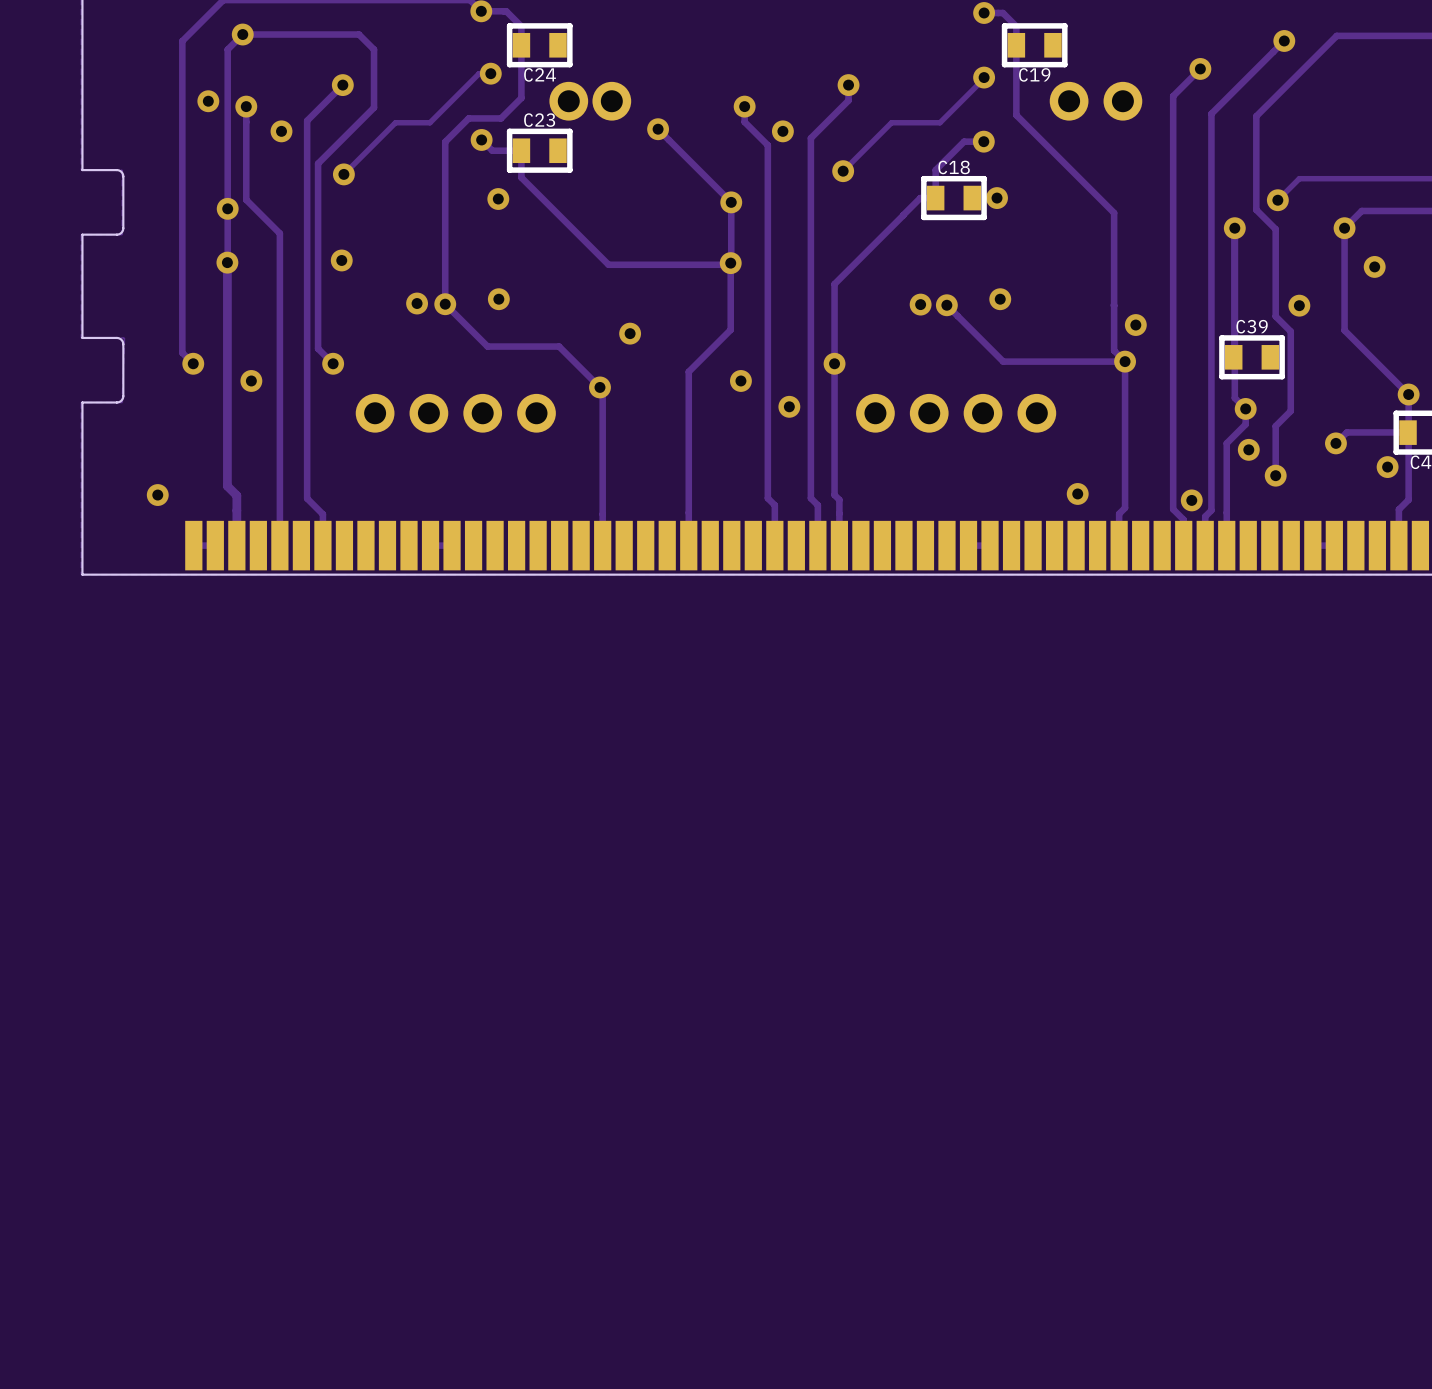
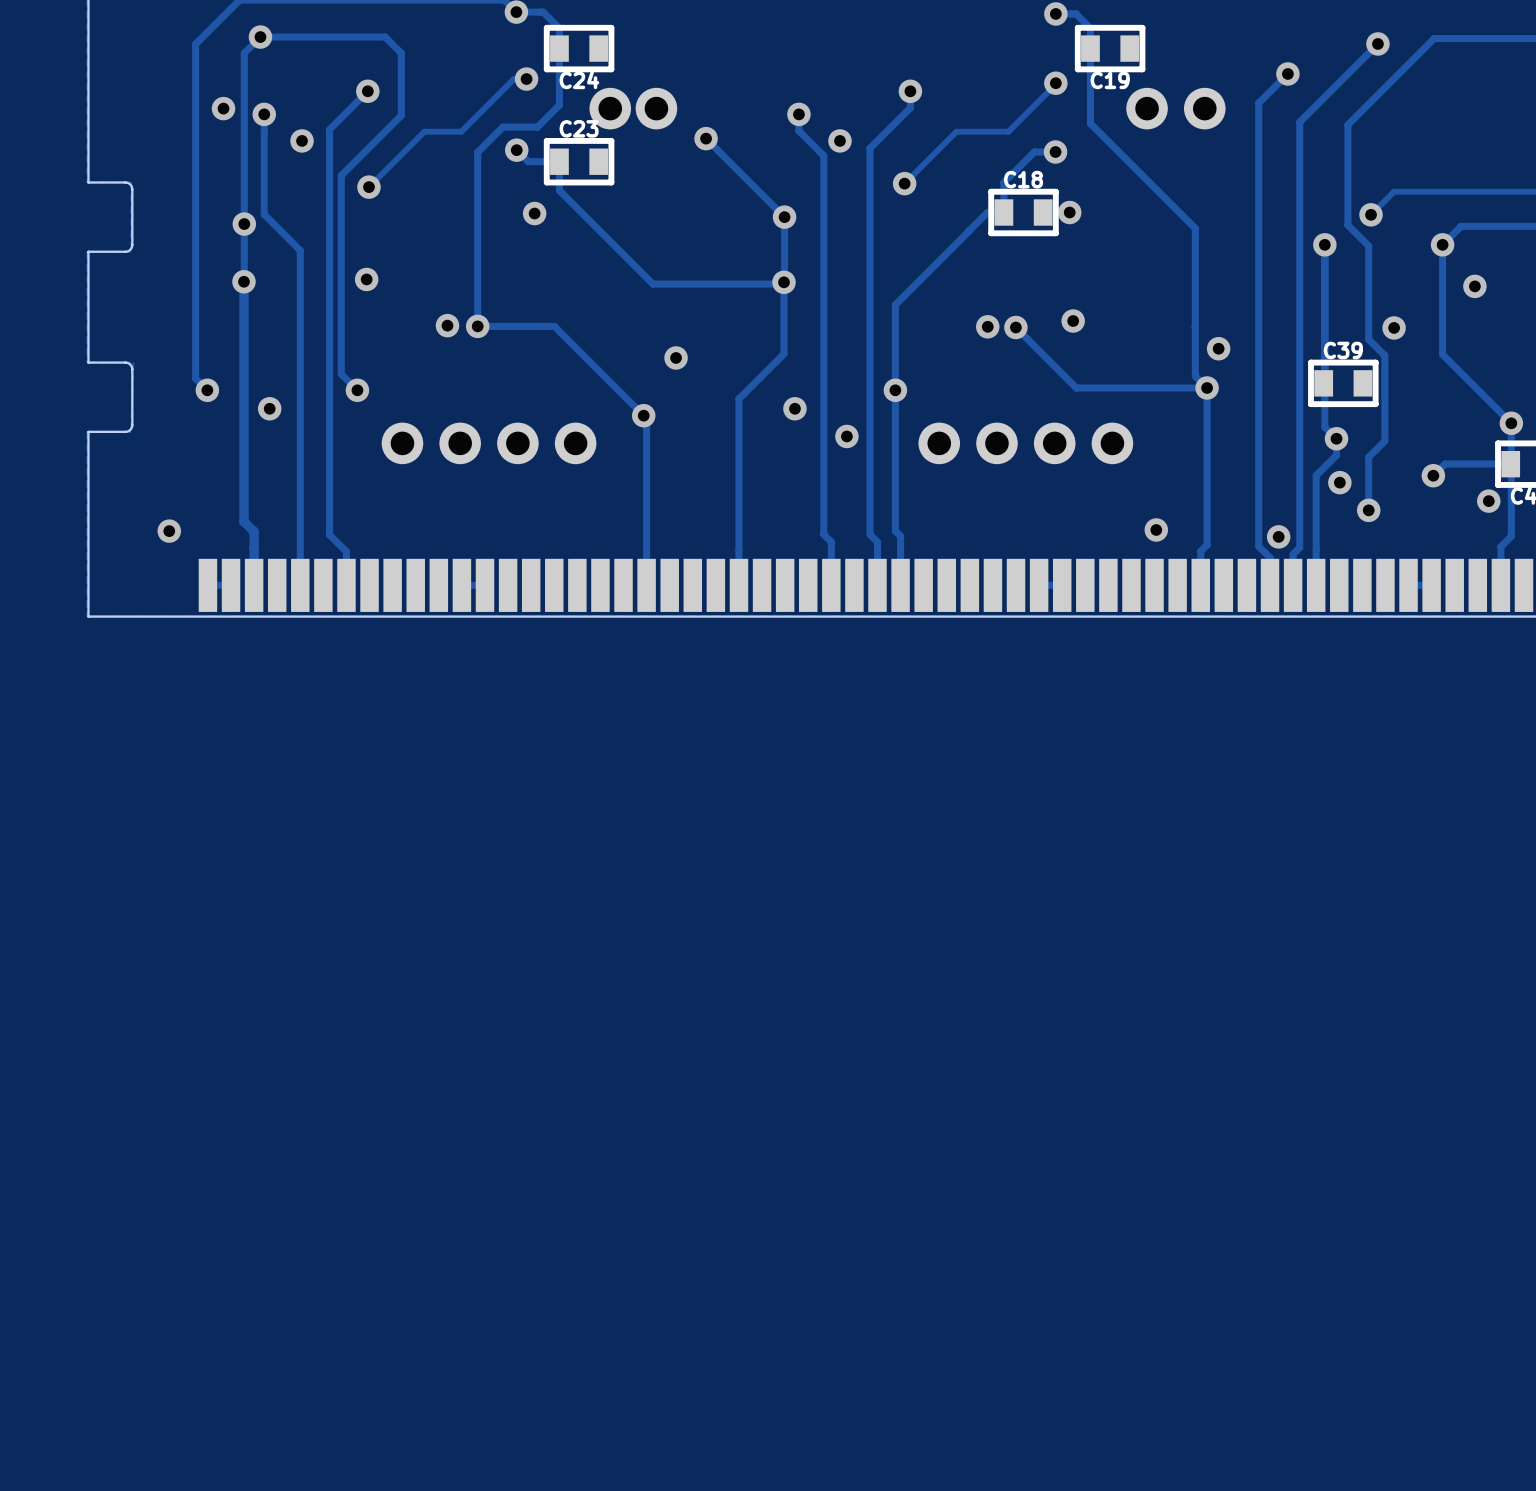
via: (498, 299) -> none
track: (445, 304) (487, 346) (559, 346) -> (477, 326) (554, 326) (599, 371)

